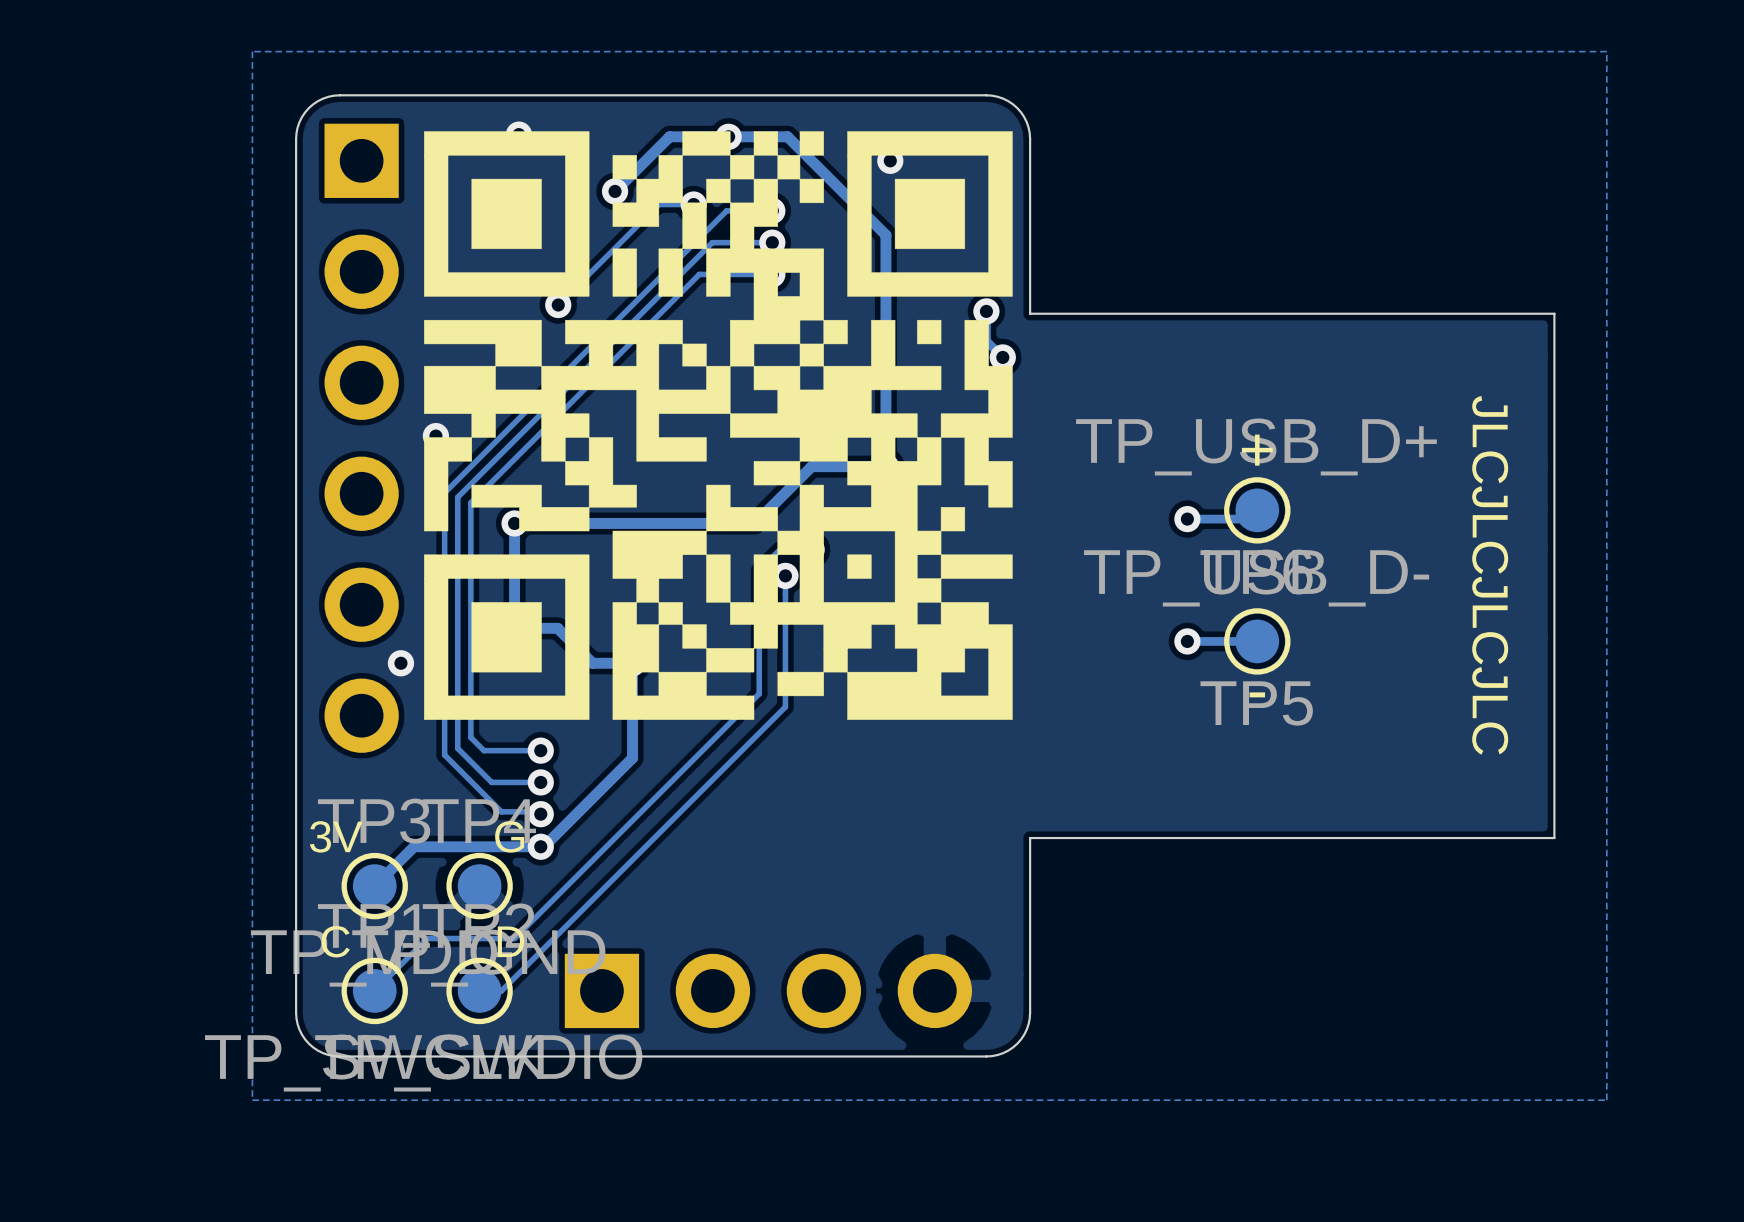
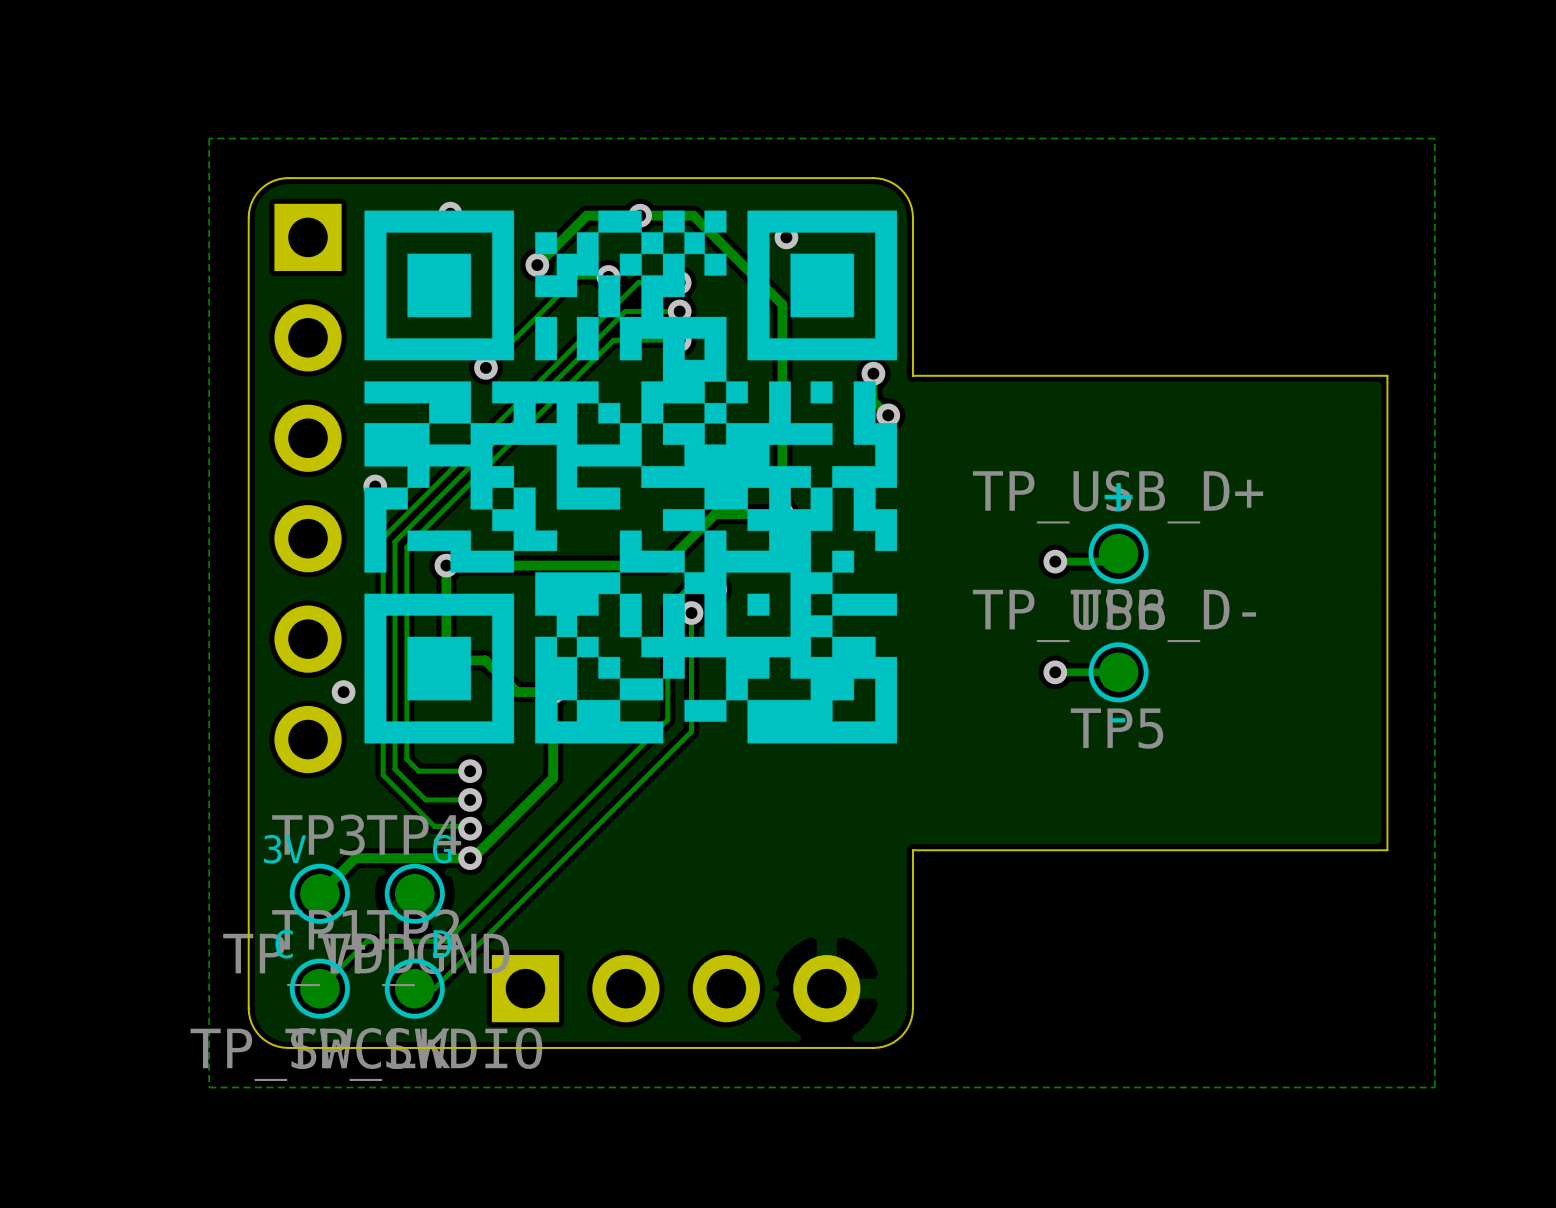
text: JLCJLCJLCJLC (1490, 575) -> none

